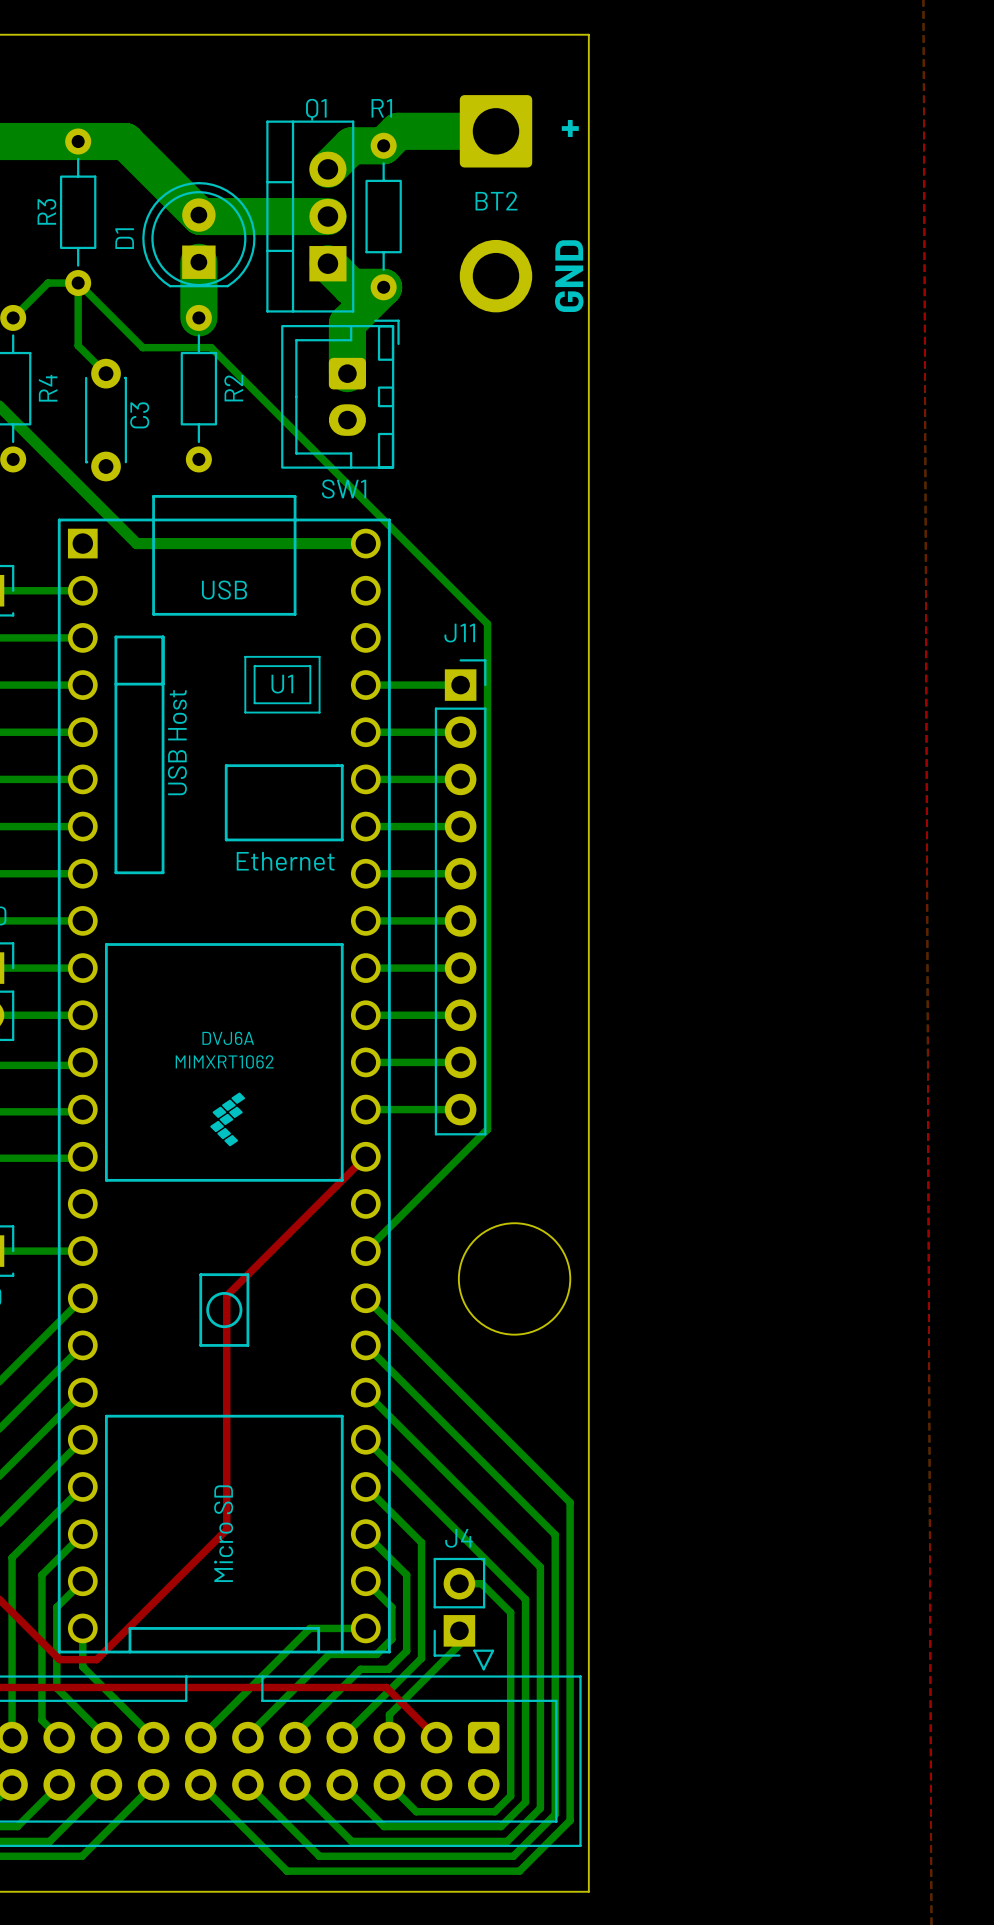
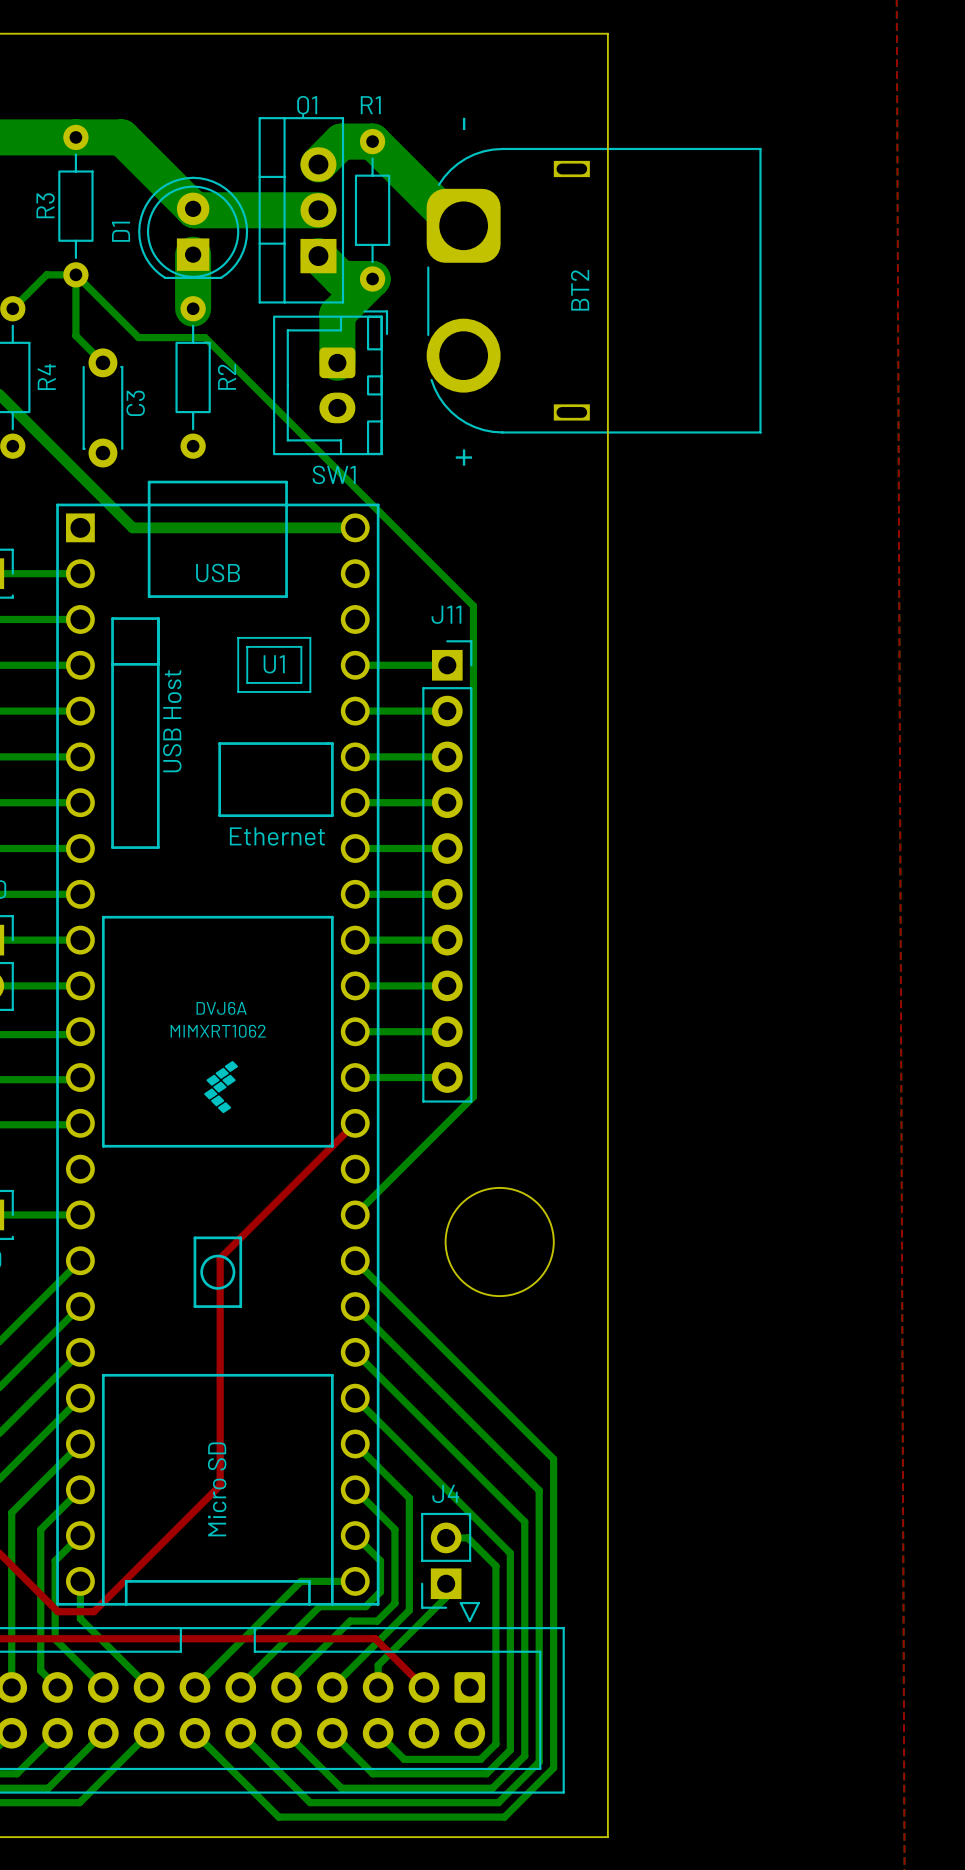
board edge: (588, 34) (588, 1891) -> (571, 33) (607, 33) (607, 1837) (571, 1837)
BT2 footprint: [459, 95, 533, 313] -> [426, 147, 762, 434]
text: + (570, 128) -> none
bottom track: (496, 131) (398, 131) (383, 145) -> (463, 225) (456, 225) (372, 141)
text: GND (569, 276) -> none

